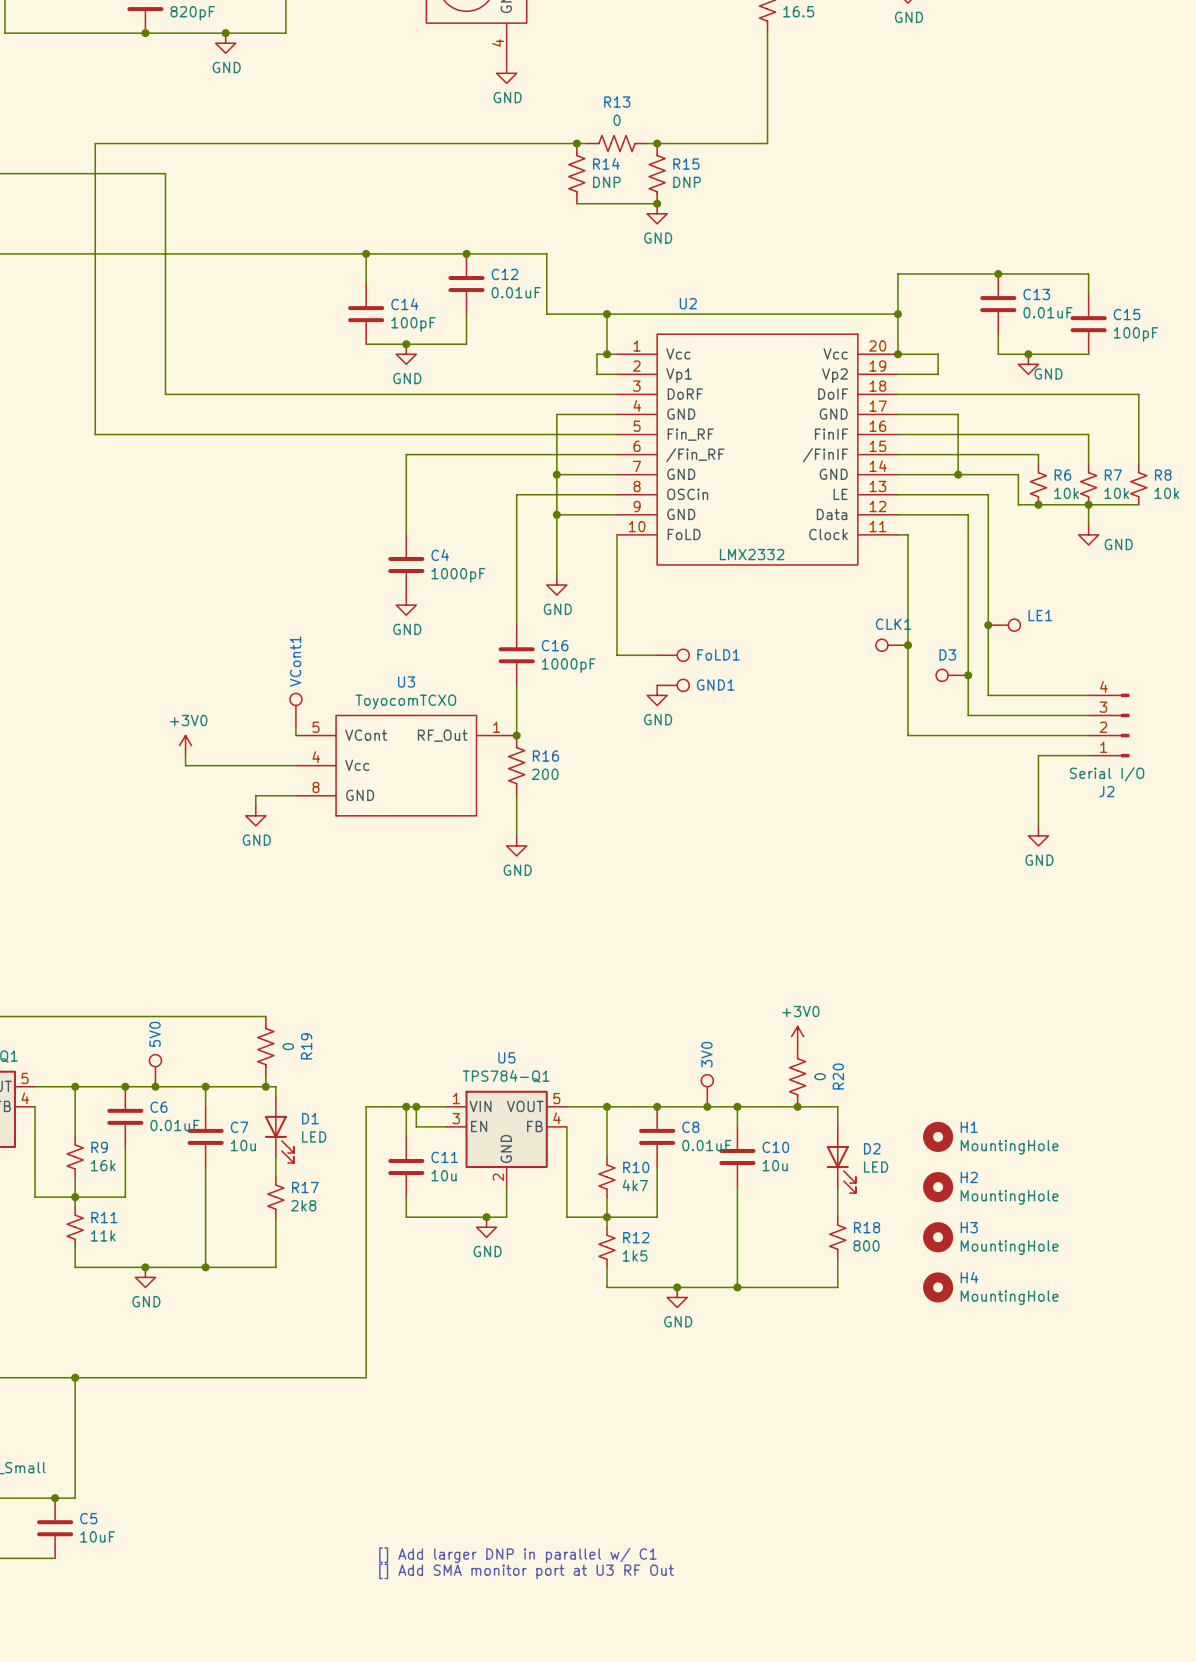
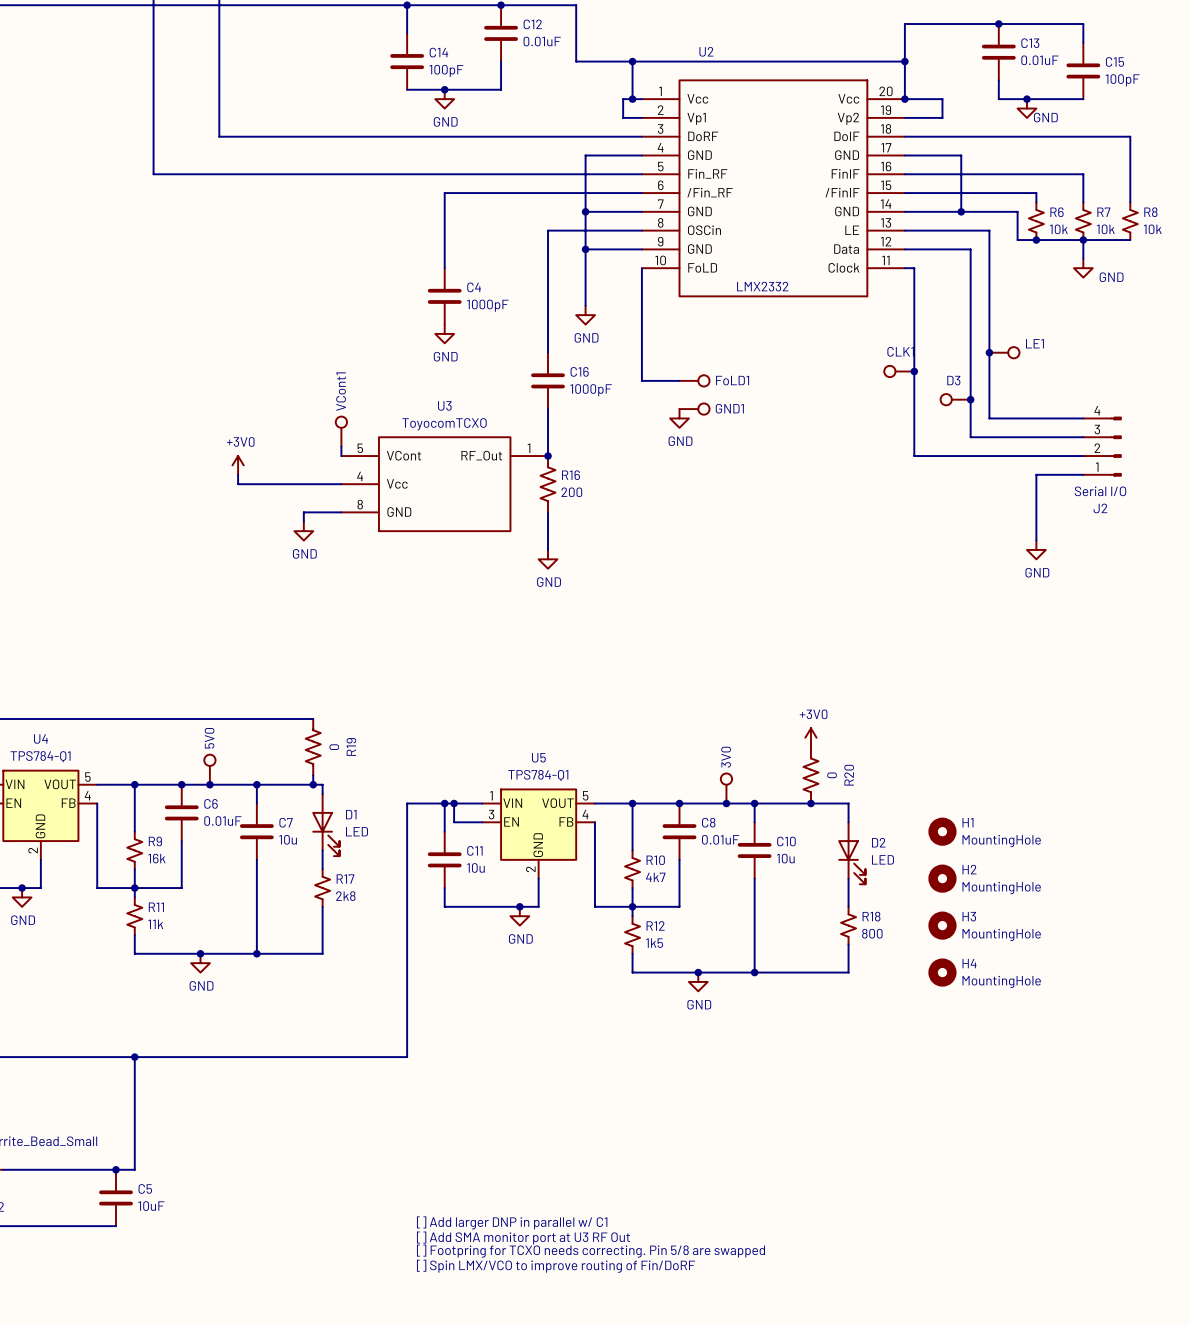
text: none -> [] Footpring for TCXO needs correcting. Pin 5/8 are swapped (590, 1251)
text: none -> [] Spin LMX/VCO to improve routing of Fin/DoRF (556, 1266)

